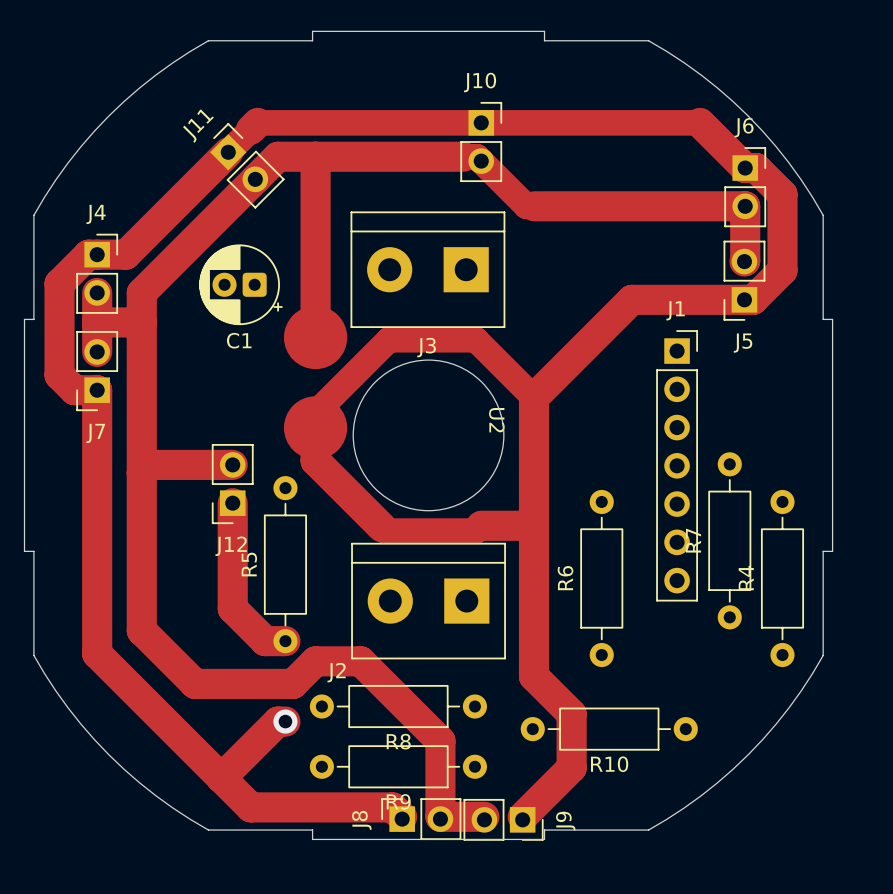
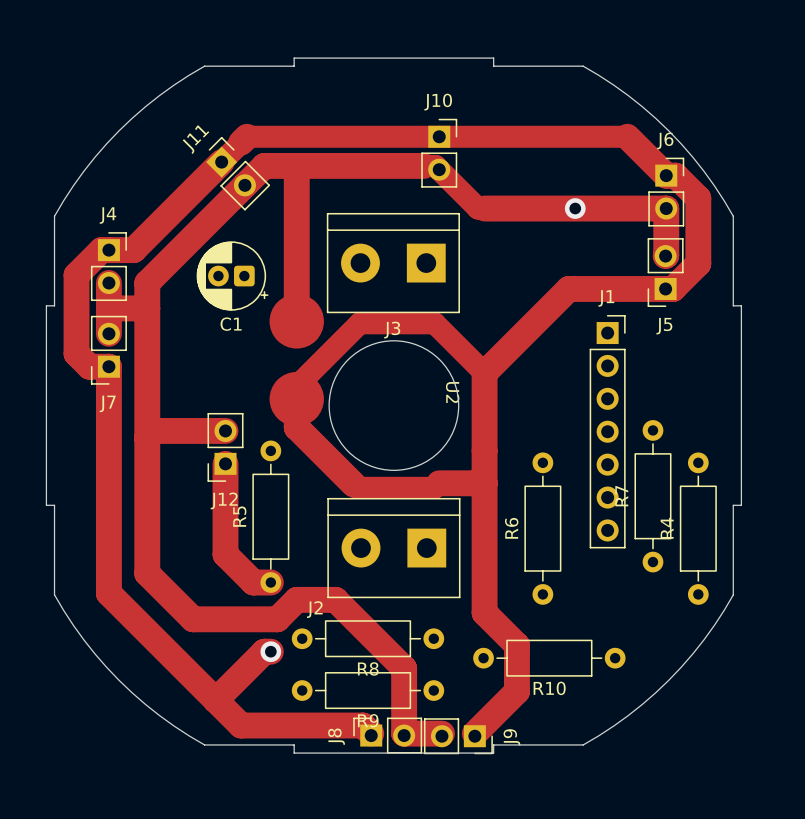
via: none -> (575, 208)

